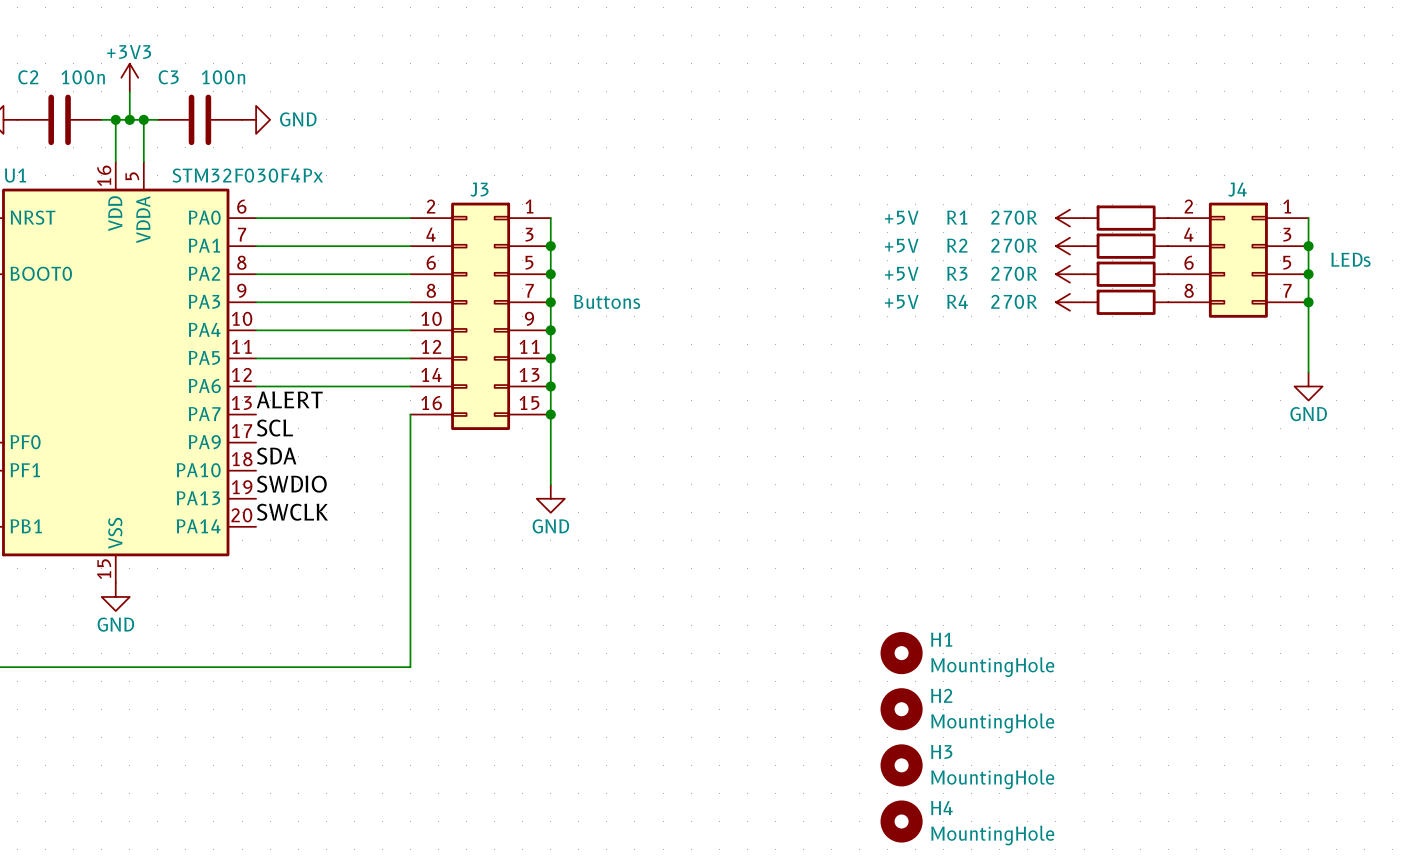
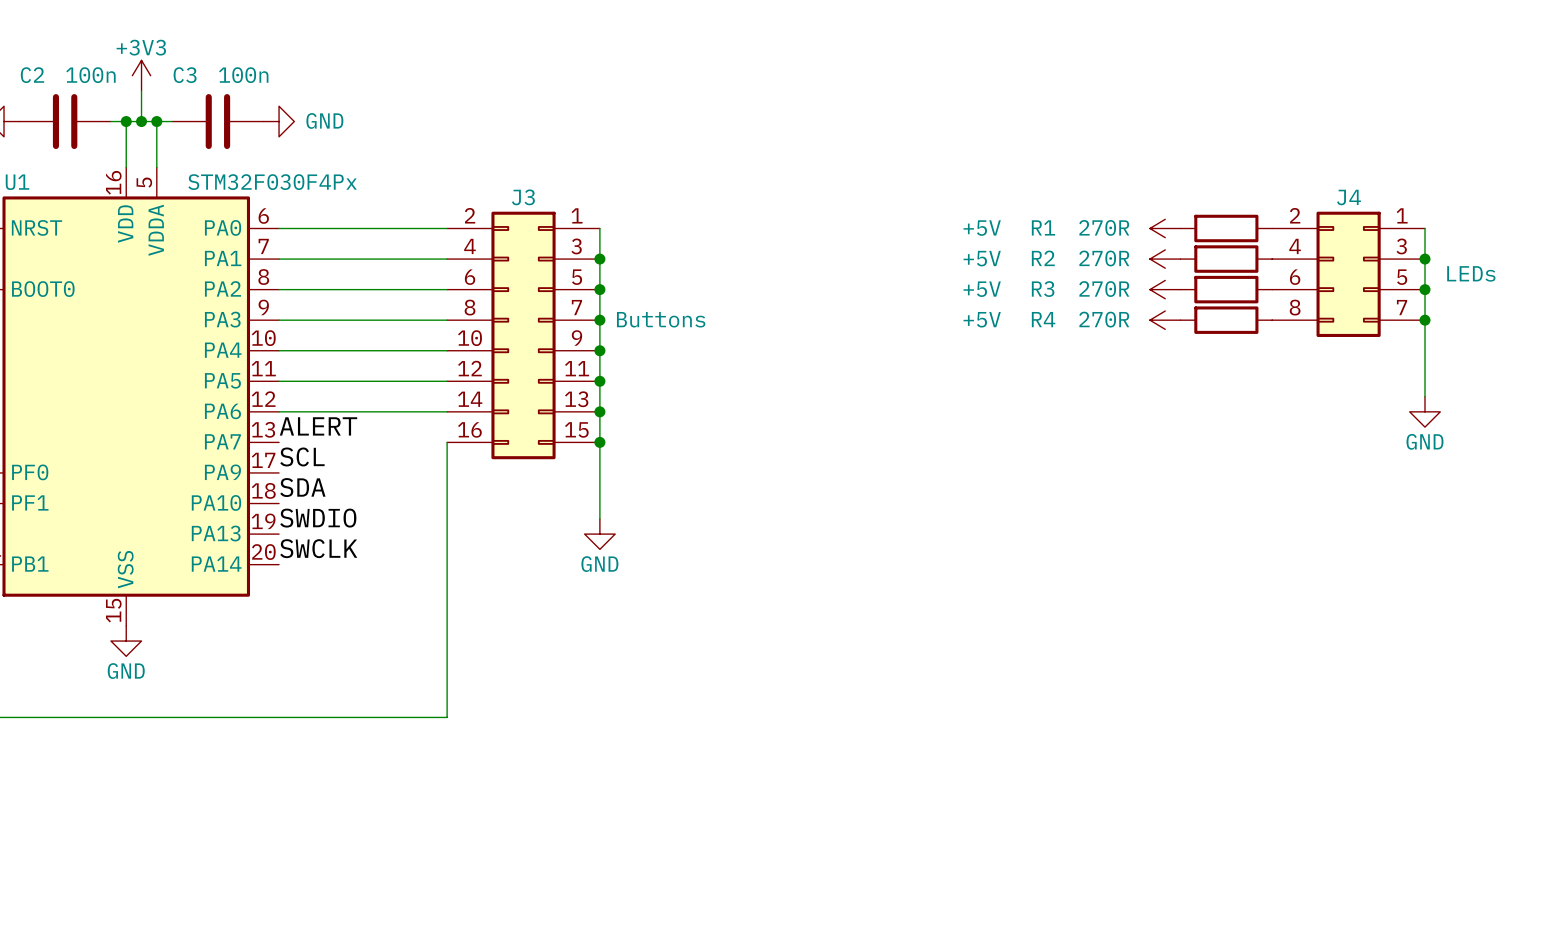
H1: MountingHole (901, 653) -> none
H2: MountingHole (901, 709) -> none
H3: MountingHole (901, 765) -> none
H4: MountingHole (901, 821) -> none

